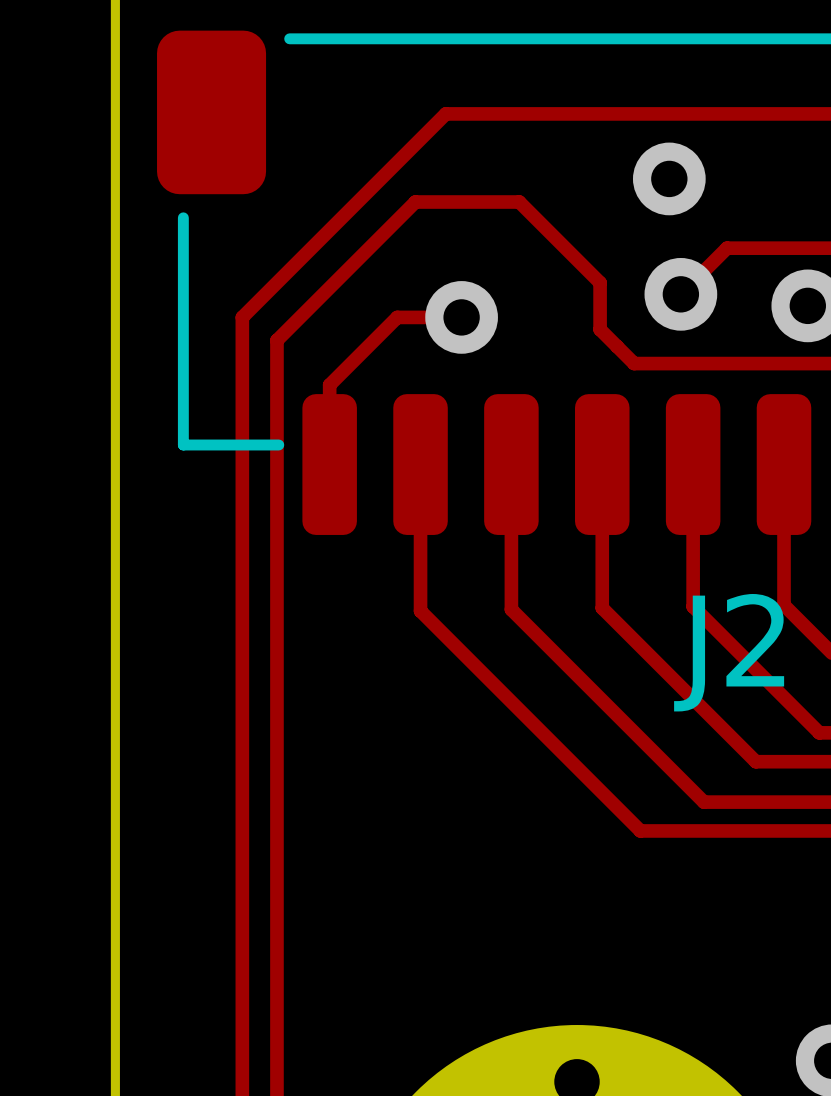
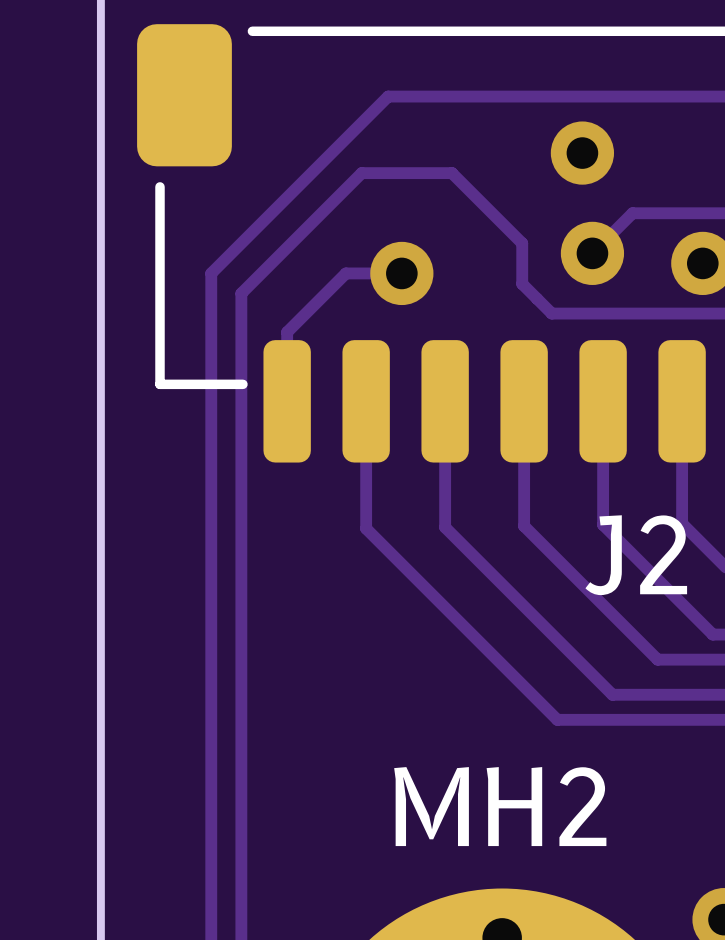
MH2 name: none -> MH2 (500, 806)

